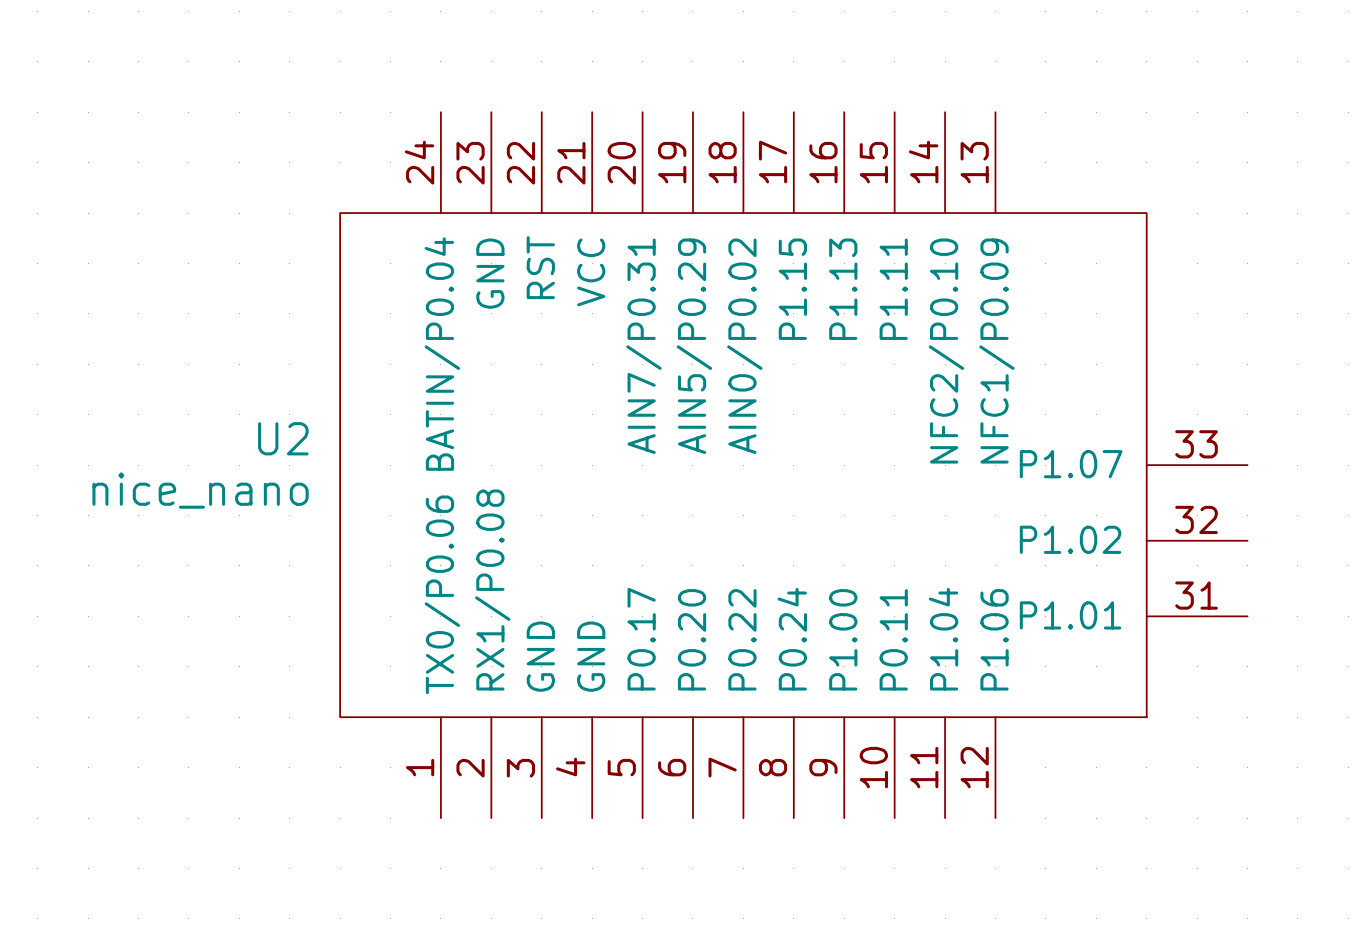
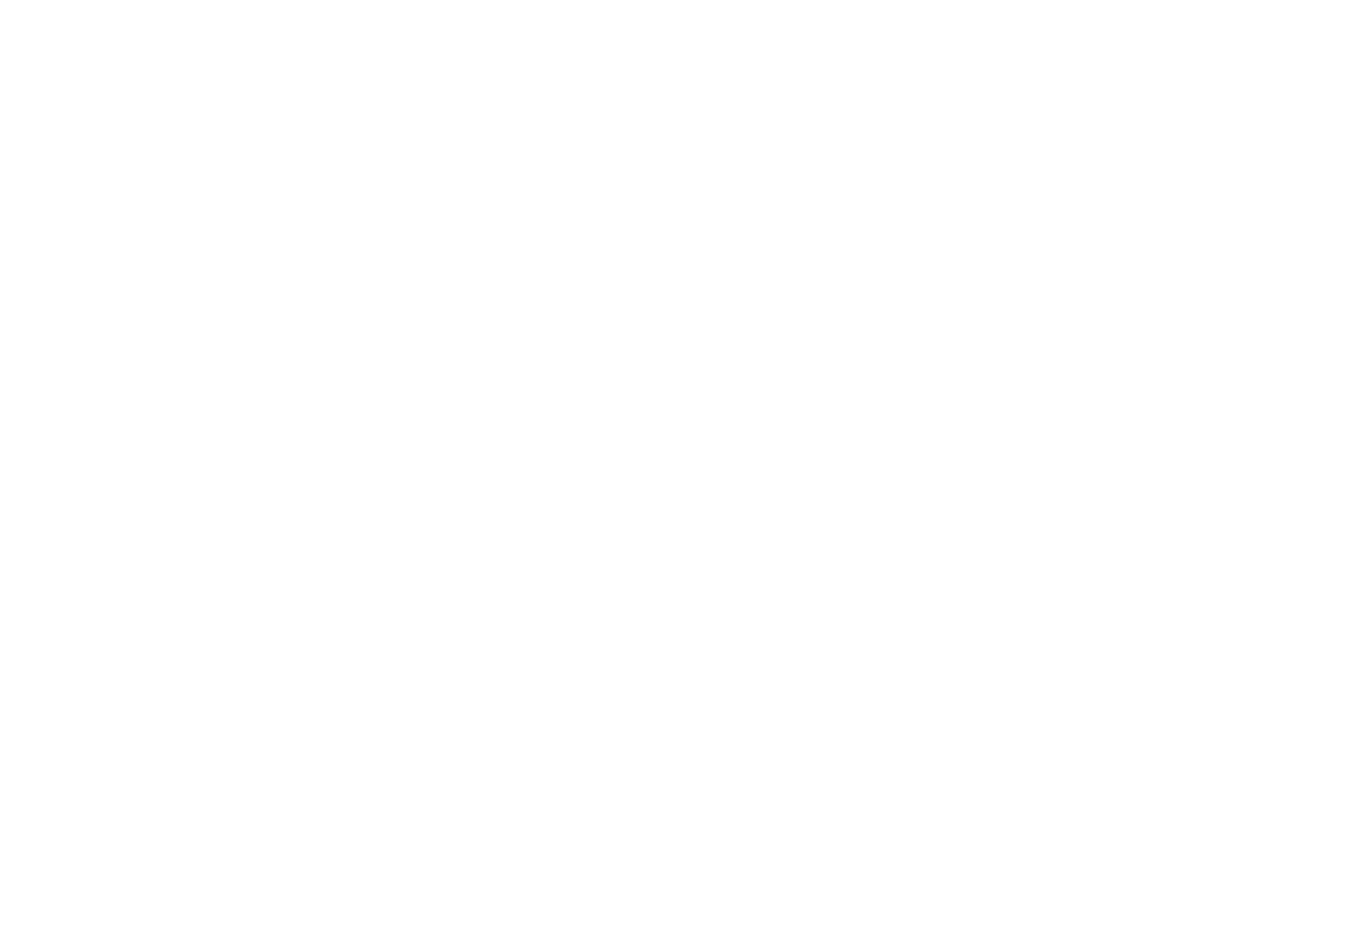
U2: nice_nano (793, 465) -> none

